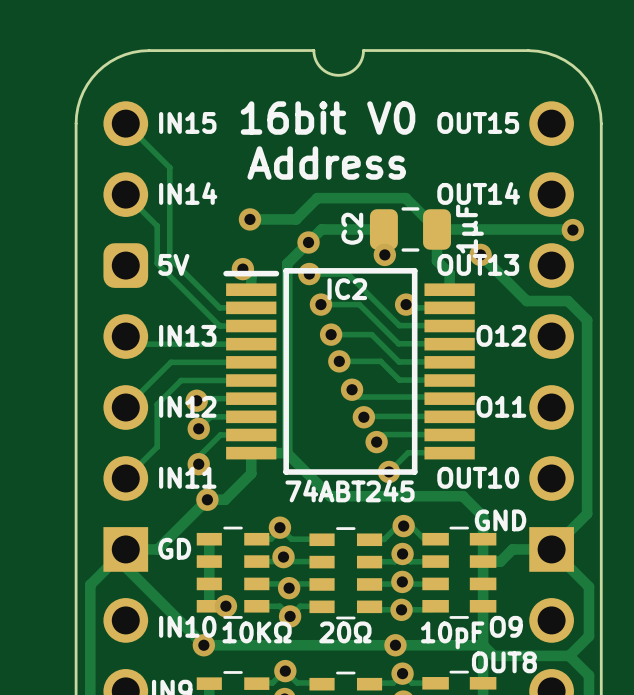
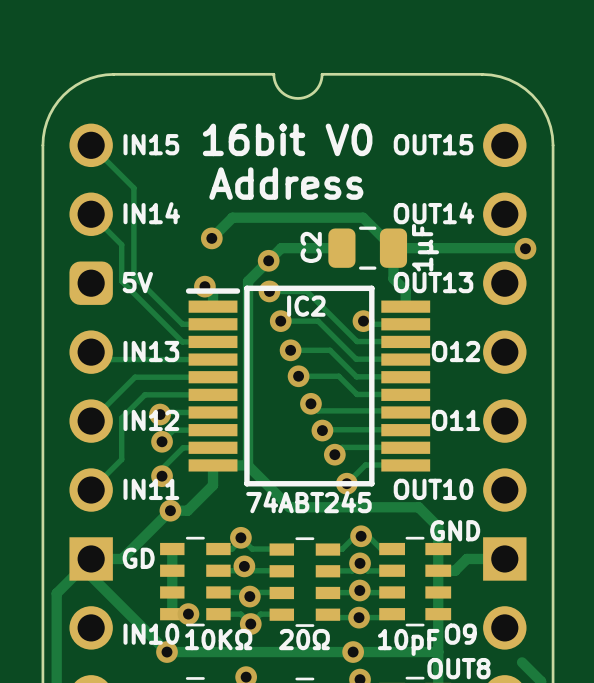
track: (317, 198) (296, 219) (249, 219) -> (277, 217) (232, 217) (211, 238)
via: (384, 254) -> none
track: (480, 254) (526, 301) (568, 301) (587, 320) (587, 513) (551, 549) (588, 586) (588, 636) (569, 655) (493, 655) (483, 645) -> none
via: (480, 254) -> none

